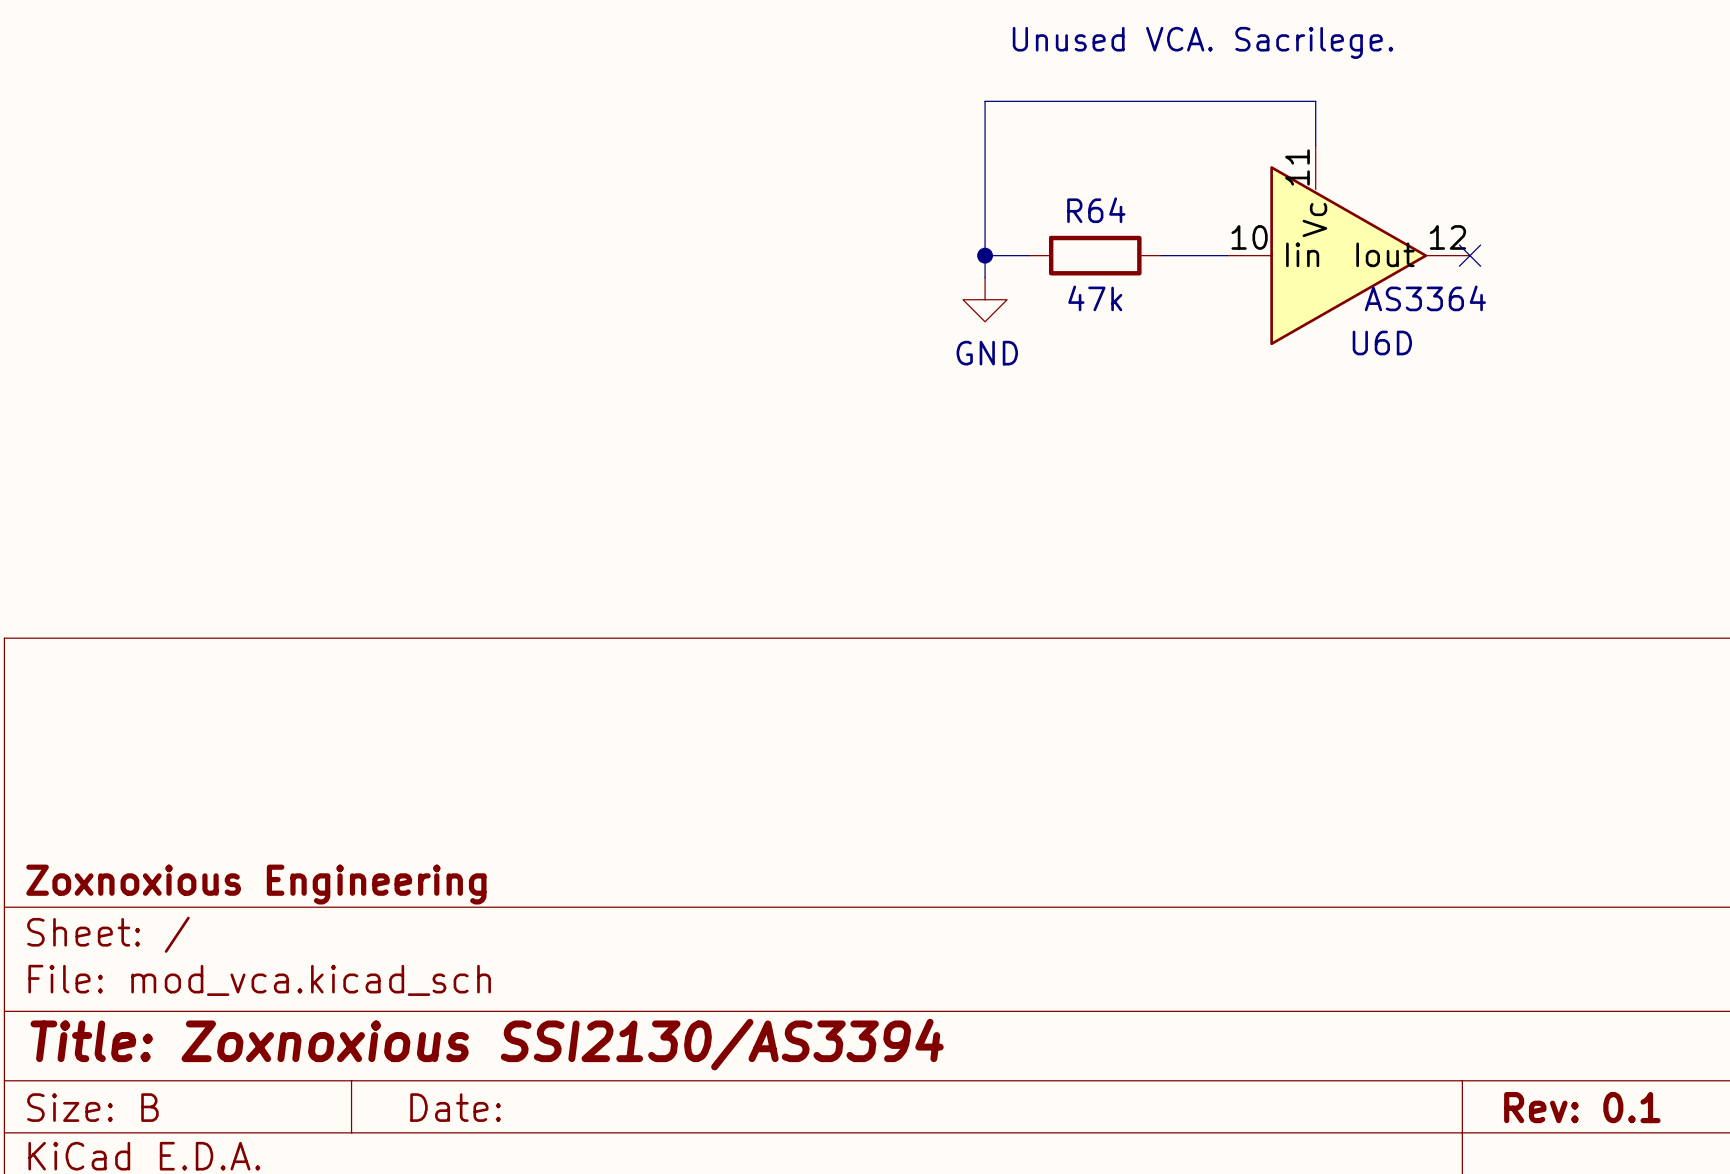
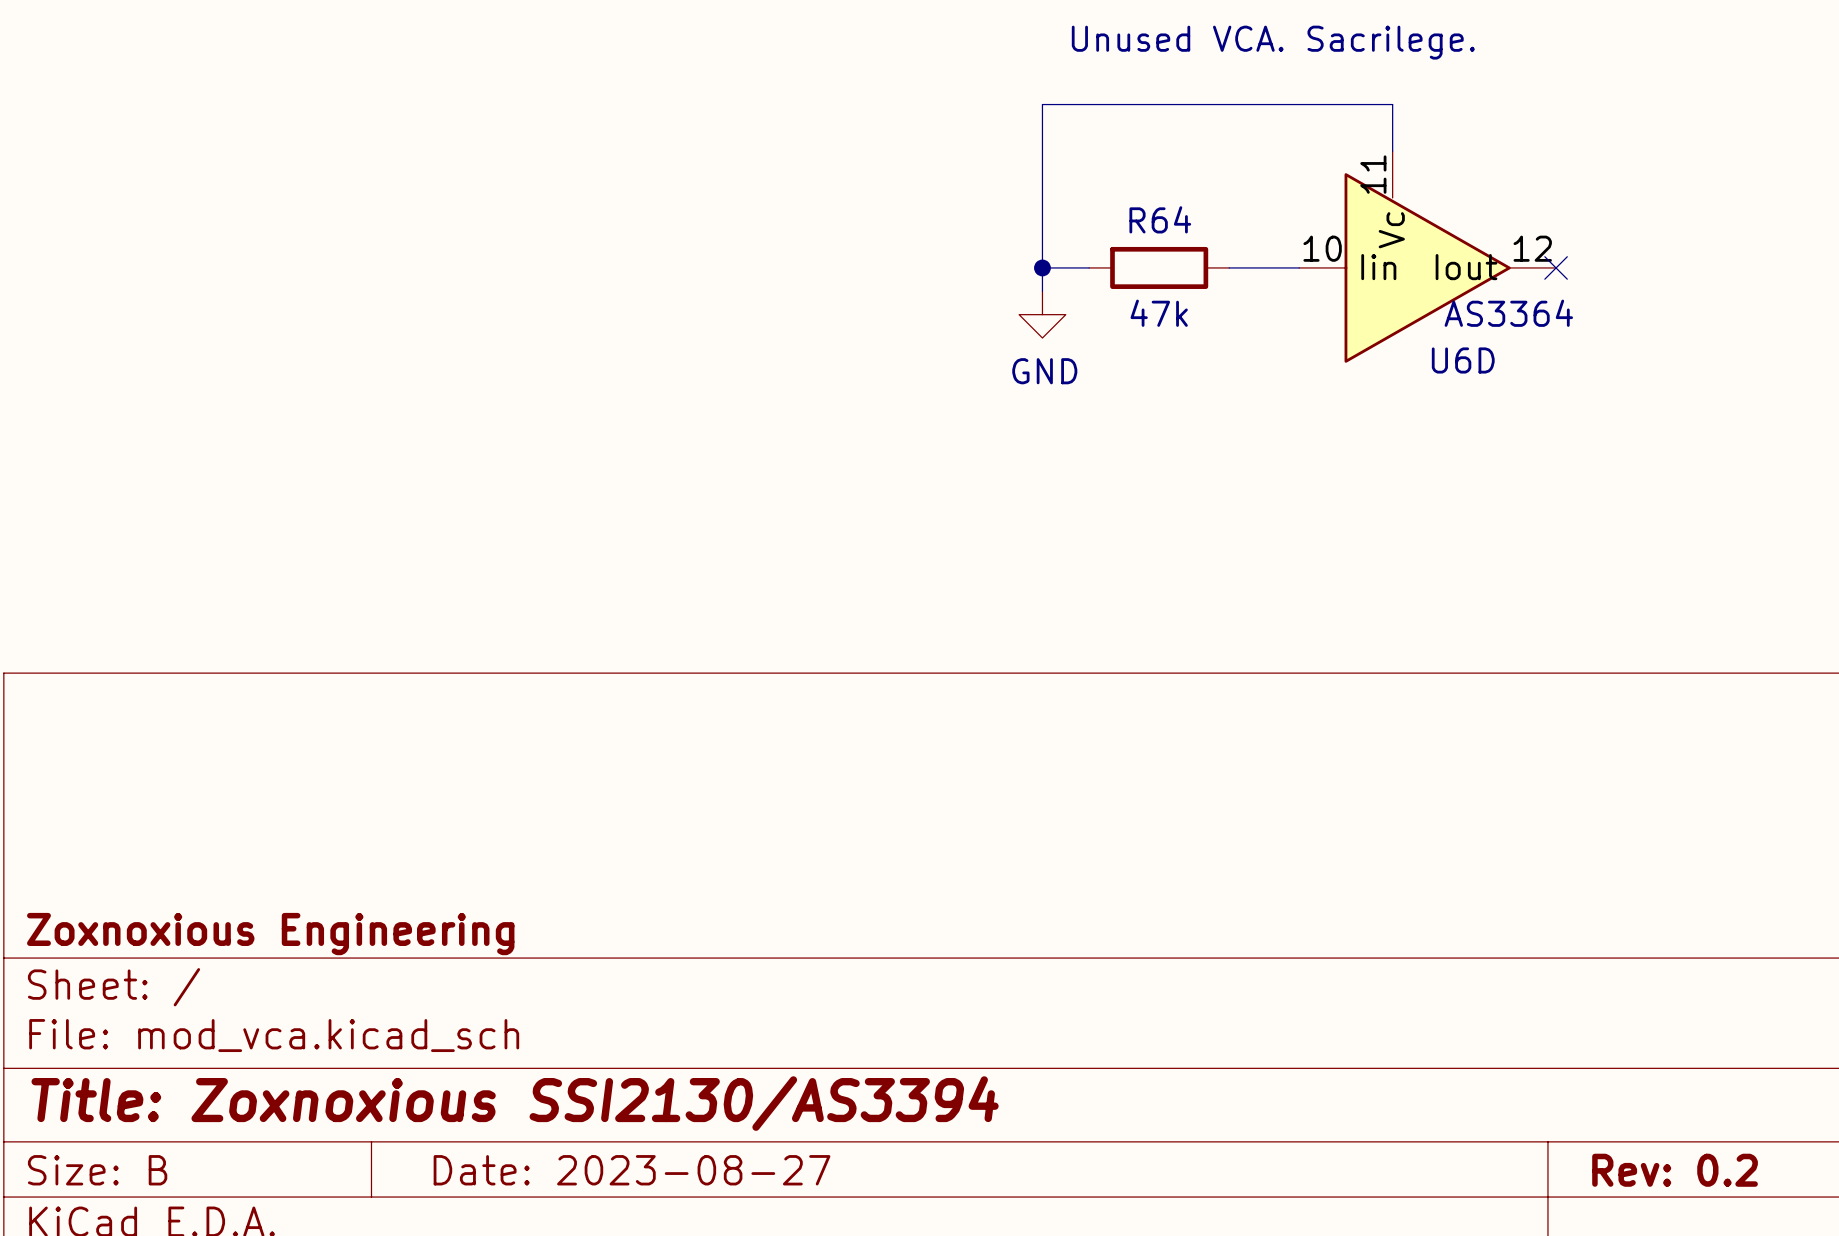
title block: Date: (455, 1107) -> Date: 2023-08-27 (632, 1170)
title block: Rev: 0.1 (1582, 1107) -> Rev: 0.2 (1675, 1170)

